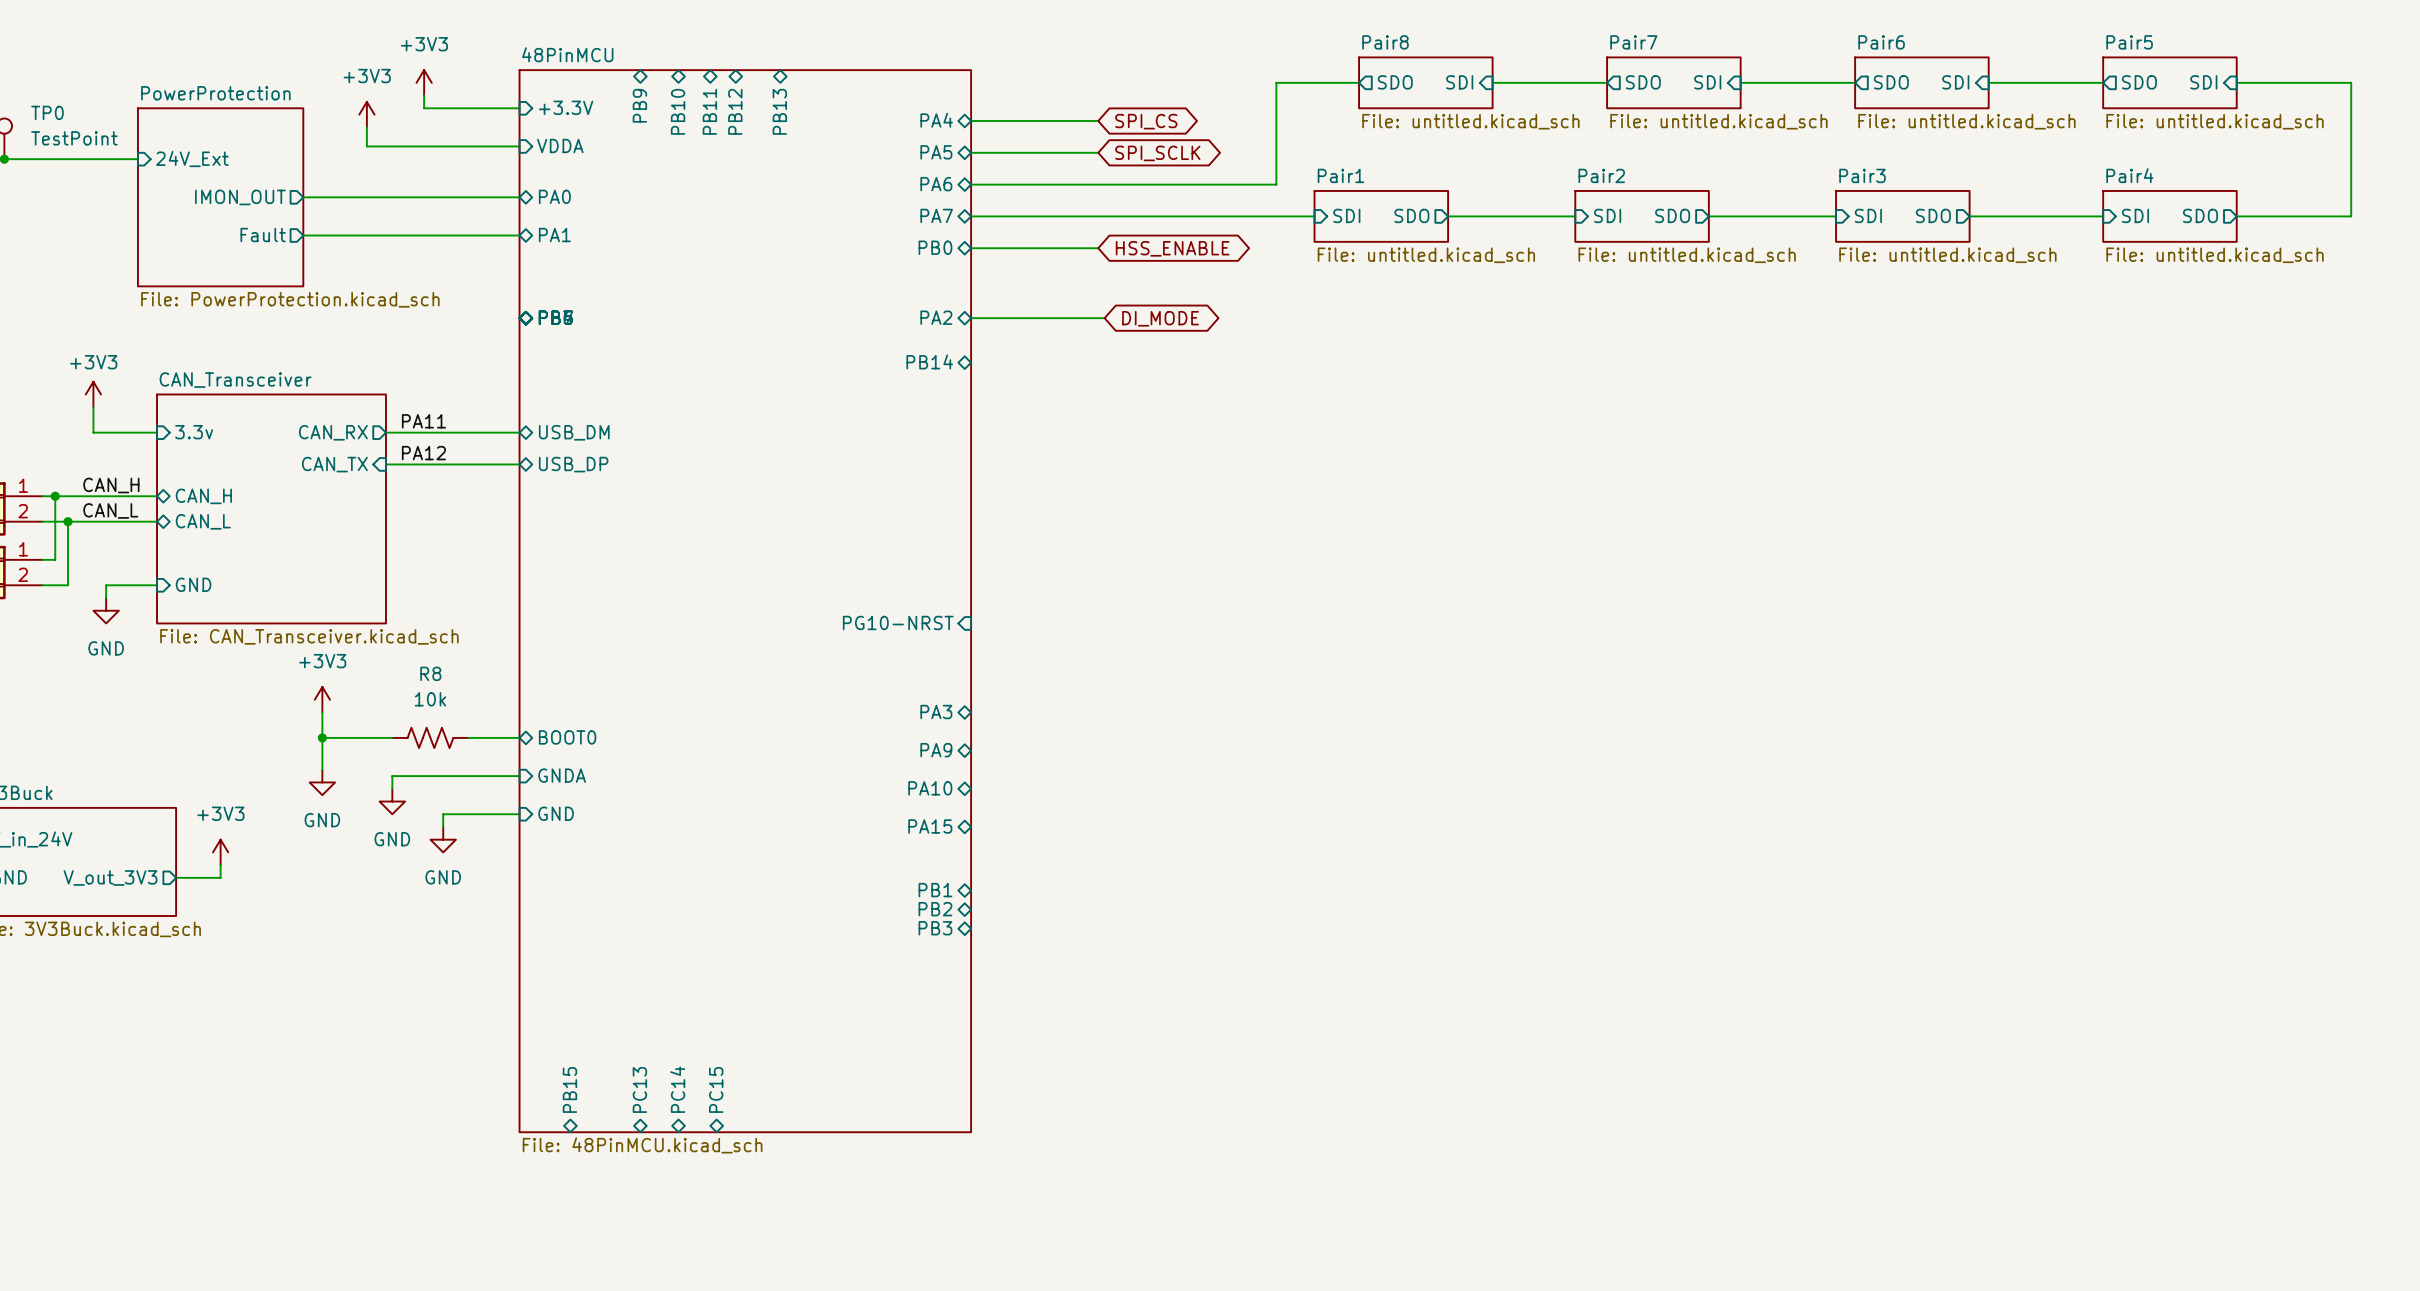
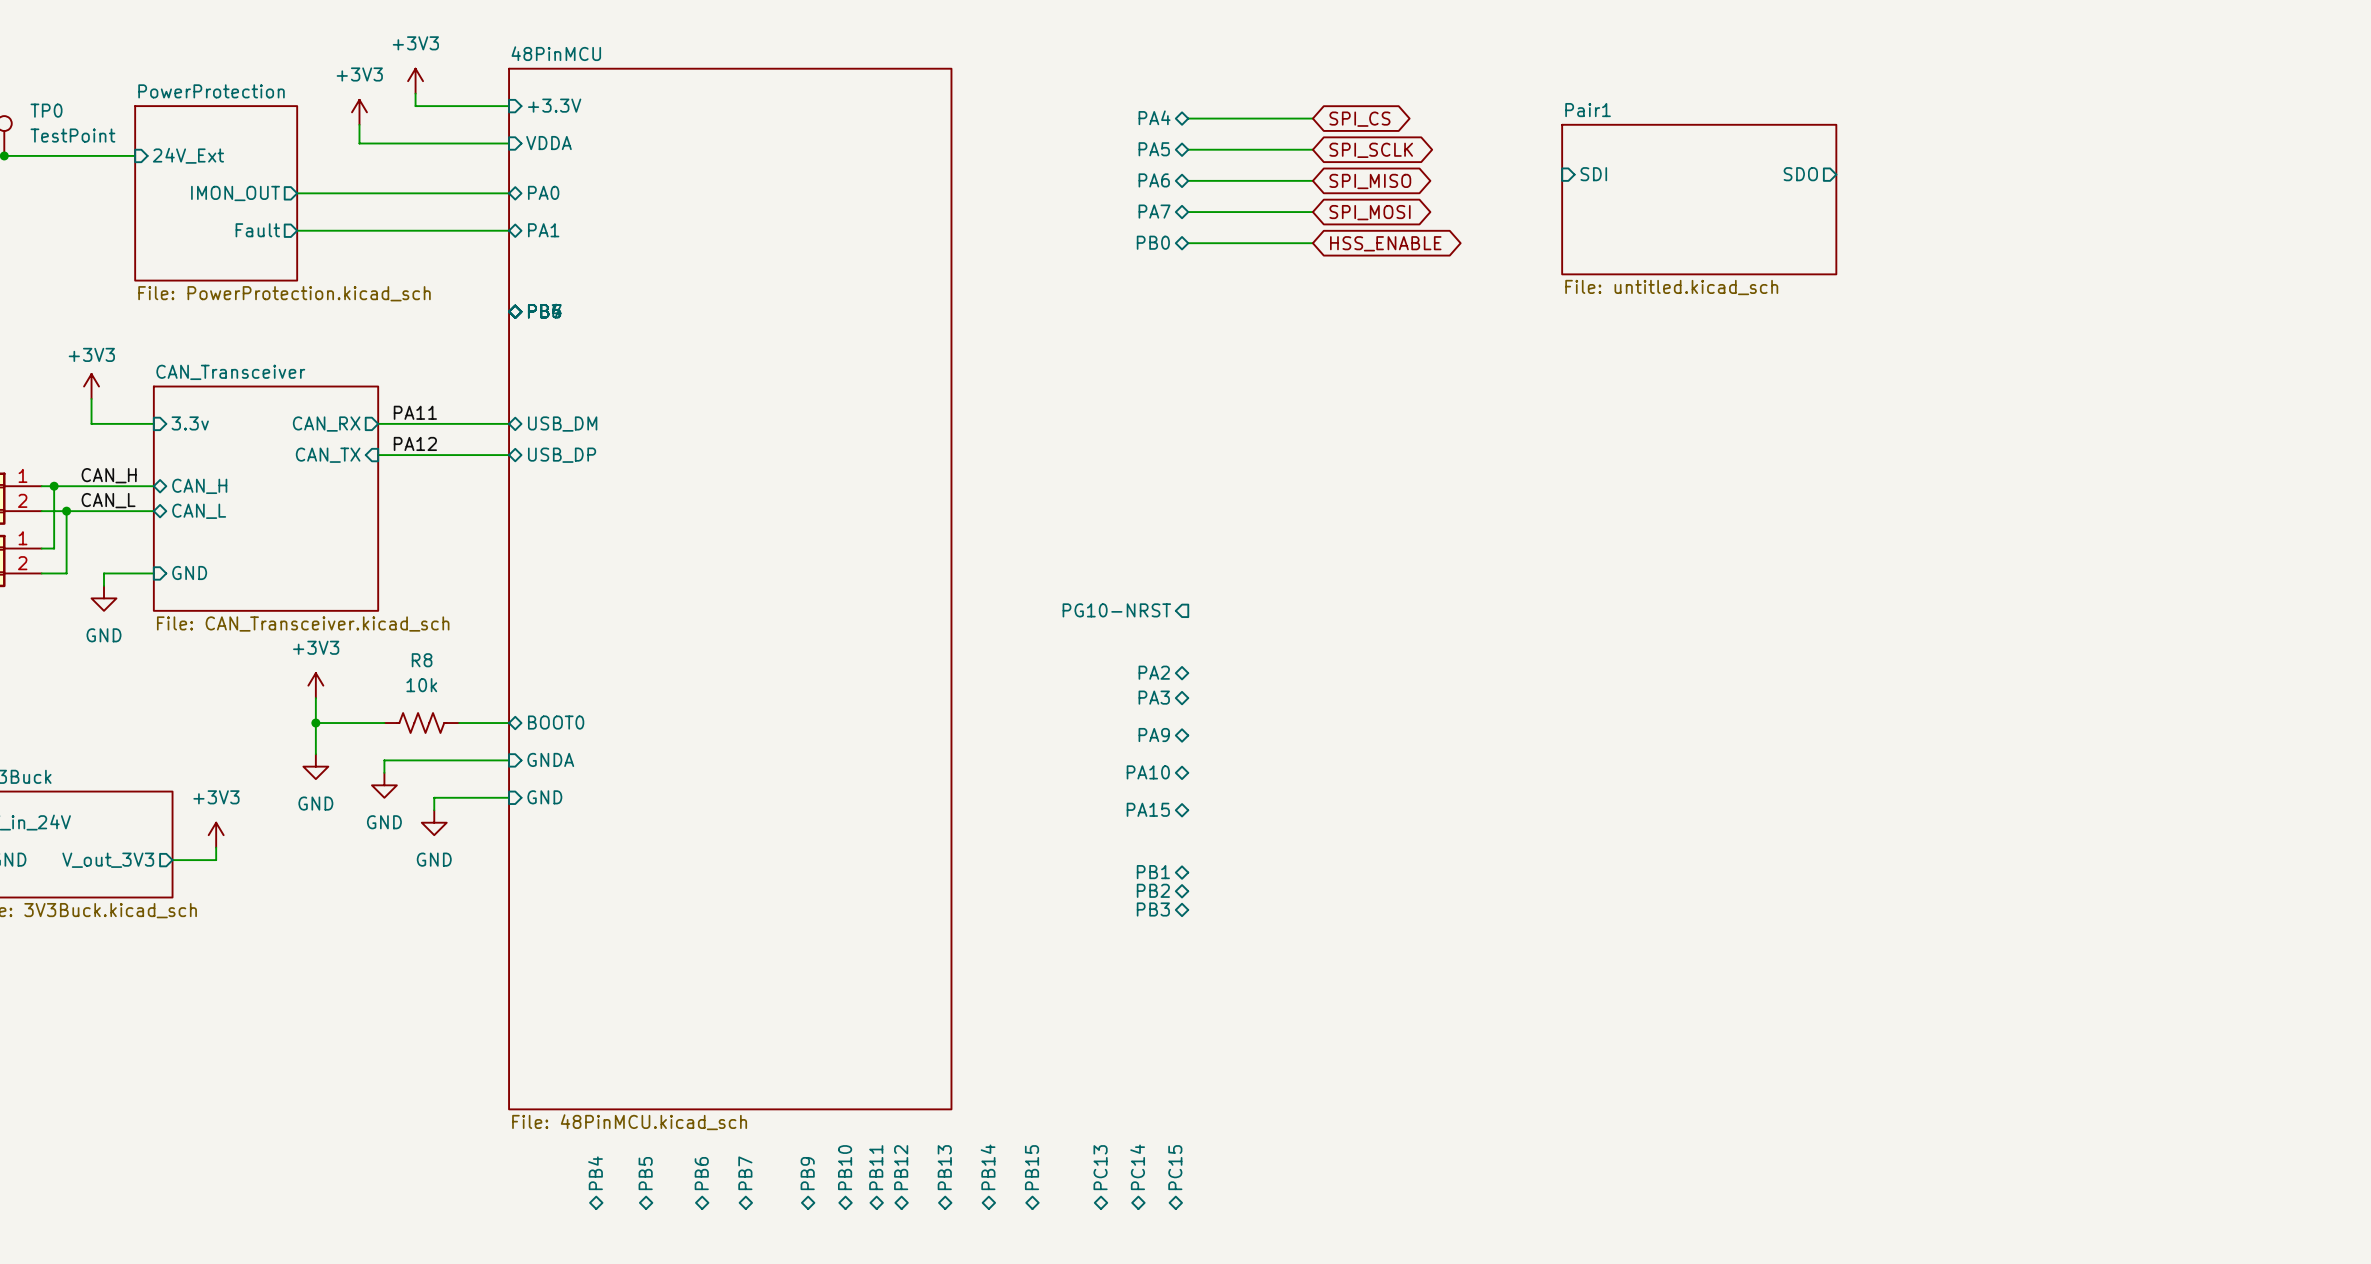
wire: (1359, 82) (1276, 82) (1276, 184) -> (1312, 180) (1250, 180)
sheet pin: SDO (1395, 82) -> none
sheet Pair8: File: untitled.kicad_sch (1425, 82) -> none
sheet pin: SDI (1459, 82) -> none
wire: (1492, 82) (1607, 82) -> none
sheet pin: SDO (1643, 82) -> none
sheet Pair7: File: untitled.kicad_sch (1673, 82) -> none
sheet pin: SDI (1707, 82) -> none
wire: (1740, 82) (1855, 82) -> none
sheet pin: SDO (1891, 82) -> none
sheet Pair6: File: untitled.kicad_sch (1921, 82) -> none
sheet pin: SDI (1955, 82) -> none
wire: (1988, 82) (2103, 82) -> none
sheet pin: SDO (2139, 82) -> none
sheet Pair5: File: untitled.kicad_sch (2169, 82) -> none
sheet pin: SDI (2203, 82) -> none
wire: (2236, 82) (2351, 82) (2351, 216) (2236, 216) -> none
sheet pin: PB9 (639, 105) -> none
sheet pin: PB10 (678, 111) -> none
sheet pin: PB11 (709, 111) -> none
sheet pin: PB12 (735, 111) -> none
sheet pin: PB13 (779, 111) -> none
sheet pin position: PA4 (936, 120) -> PA4 (1154, 117)
wire: (971, 121) (1098, 121) -> (1188, 118) (1312, 118)
global label position: SPI_CS (1146, 121) -> SPI_CS (1359, 119)
sheet pin position: PA5 (936, 152) -> PA5 (1154, 149)
wire: (971, 152) (1098, 152) -> (1188, 149) (1312, 149)
global label position: SPI_SCLK (1157, 153) -> SPI_SCLK (1371, 150)
sheet Pair1 name position: Pair1 (1340, 175) -> Pair1 (1588, 110)
sheet pin: none -> SDO (1800, 174)
sheet pin position: PA6 (936, 184) -> PA6 (1154, 180)
wire: (971, 184) (1212, 184) -> none
global label: none -> SPI_MISO (1370, 181)
sheet Pair1 shape: [1313, 190, 1449, 243] -> [1561, 124, 1838, 276]
sheet pin position: PA7 (936, 215) -> PA7 (1154, 211)
sheet pin: SDI (1346, 215) -> none
sheet pin: SDO (1411, 215) -> none
sheet pin position: SDI (1607, 215) -> SDI (1593, 174)
sheet pin: SDO (1672, 215) -> none
sheet pin: SDI (1868, 215) -> none
sheet pin: SDO (1933, 215) -> none
sheet pin: SDI (2135, 215) -> none
sheet pin: SDO (2200, 215) -> none
wire: (971, 216) (1212, 216) -> none
wire: none -> (1287, 212) (1312, 212)
wire: (1448, 216) (1575, 216) -> none
sheet Pair2: File: untitled.kicad_sch (1642, 216) -> none
wire: (1708, 216) (1836, 216) -> none
sheet Pair3: File: untitled.kicad_sch (1902, 216) -> none
wire: (1969, 216) (2103, 216) -> none
sheet Pair4: File: untitled.kicad_sch (2169, 216) -> none
global label: none -> SPI_MOSI (1370, 212)
sheet pin position: PB0 (935, 247) -> PB0 (1153, 242)
wire: (971, 248) (1098, 248) -> (1188, 243) (1312, 243)
global label position: HSS_ENABLE (1172, 248) -> HSS_ENABLE (1385, 243)
sheet Pair1 value position: File: untitled.kicad_sch (1426, 255) -> File: untitled.kicad_sch (1671, 287)
sheet pin: PA2 (936, 317) -> none
wire: (971, 318) (1104, 318) -> none
global label: DI_MODE (1160, 318) -> none
sheet pin: PB14 (929, 361) -> none
sheet pin position: PG10-NRST (898, 622) -> PG10-NRST (1116, 610)
sheet pin: none -> PA2 (1154, 672)
sheet pin position: PA3 (936, 712) -> PA3 (1154, 697)
sheet pin position: PA9 (936, 750) -> PA9 (1154, 735)
sheet pin position: PA10 (930, 788) -> PA10 (1148, 772)
sheet pin position: PA15 (930, 826) -> PA15 (1148, 809)
sheet pin position: PB1 (935, 890) -> PB1 (1153, 872)
sheet pin position: PB2 (935, 909) -> PB2 (1153, 890)
sheet pin position: PB3 (935, 928) -> PB3 (1153, 909)
sheet pin: PB15 (569, 1089) -> none
sheet pin: PC13 (639, 1089) -> none
sheet pin: PC14 (677, 1089) -> none
sheet pin: PC15 (716, 1089) -> none
sheet pin: none -> PB10 (845, 1167)
sheet pin: none -> PB11 (876, 1167)
sheet pin: none -> PB12 (901, 1167)
sheet pin: none -> PB13 (944, 1167)
sheet pin: none -> PB14 (988, 1167)
sheet pin: none -> PB15 (1032, 1167)
sheet pin: none -> PC13 (1100, 1167)
sheet pin: none -> PC14 (1137, 1167)
sheet pin: none -> PC15 (1175, 1167)
sheet pin: none -> PB4 (595, 1173)
sheet pin: none -> PB5 (645, 1173)
sheet pin: none -> PB6 (701, 1173)
sheet pin: none -> PB7 (745, 1173)
sheet pin: none -> PB9 (807, 1173)

